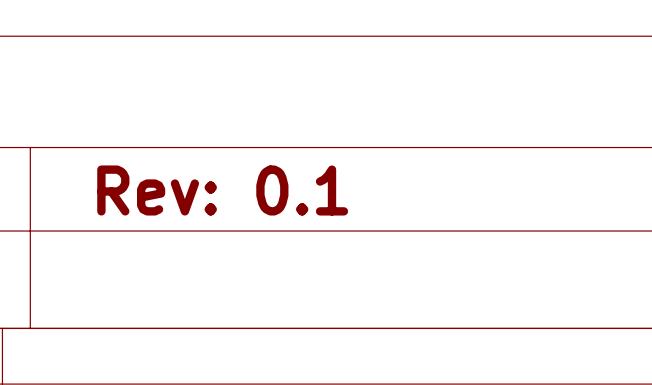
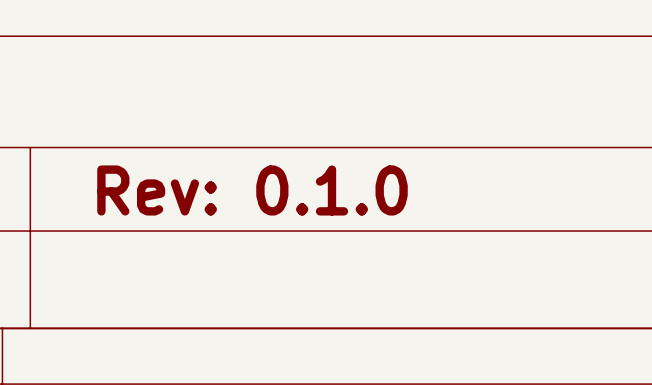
title block: Rev: 0.1 (222, 190) -> Rev: 0.1.0 (252, 190)

